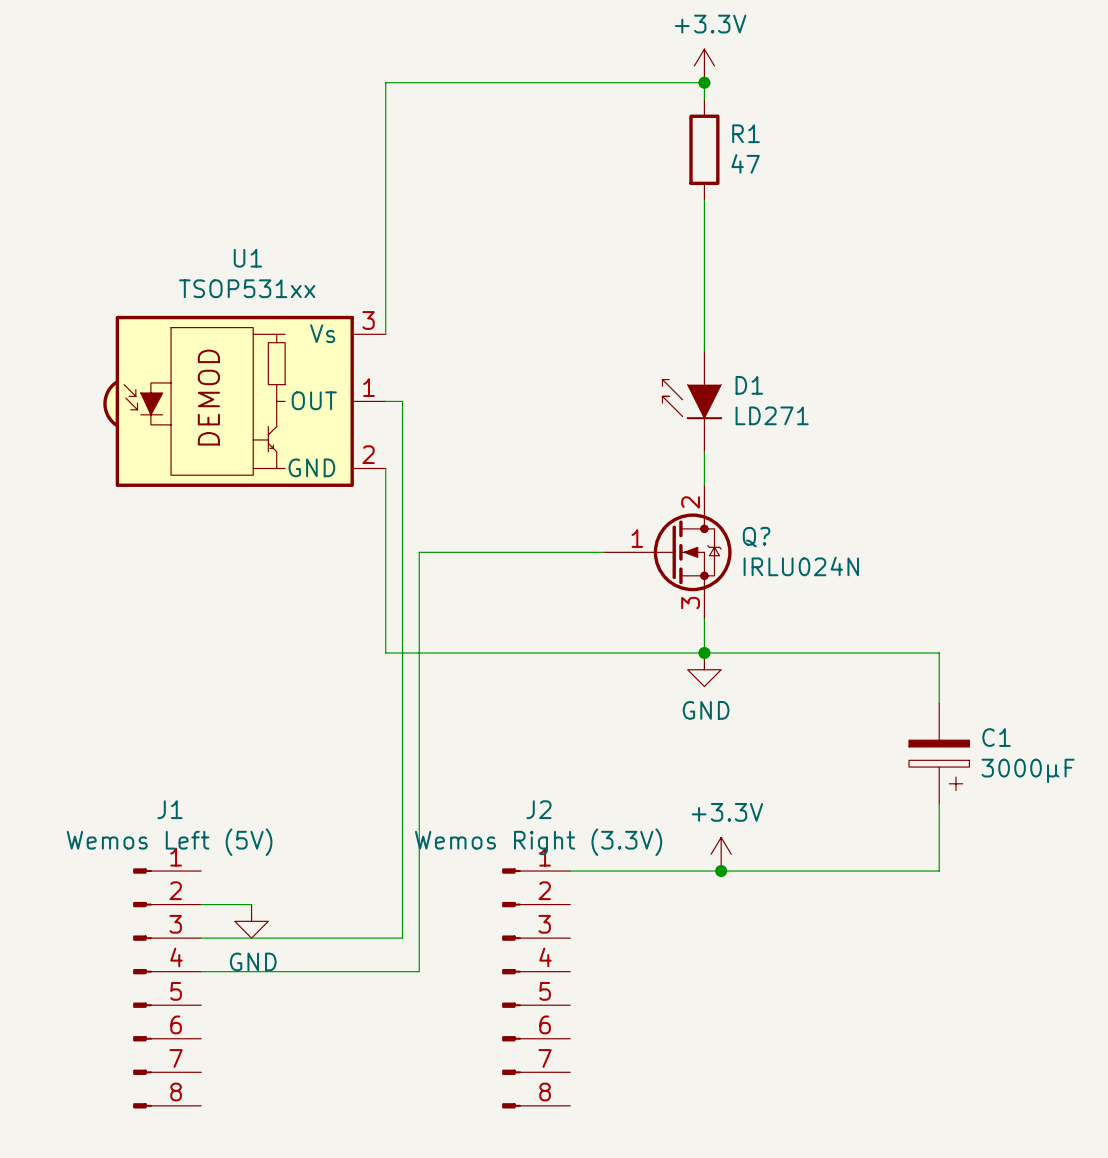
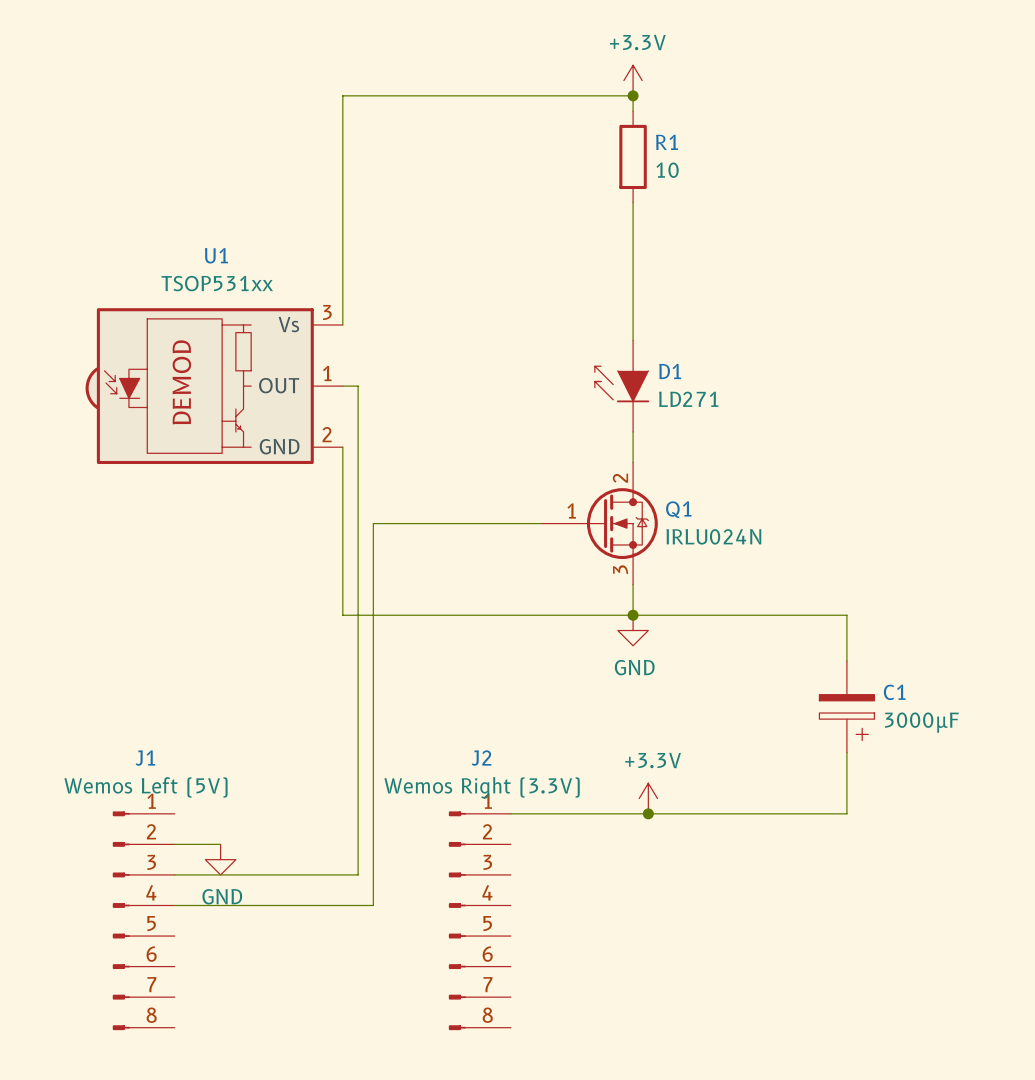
R1 value: 47 (745, 163) -> 10 (667, 170)
Q? name: Q? (756, 537) -> Q1 (678, 509)

